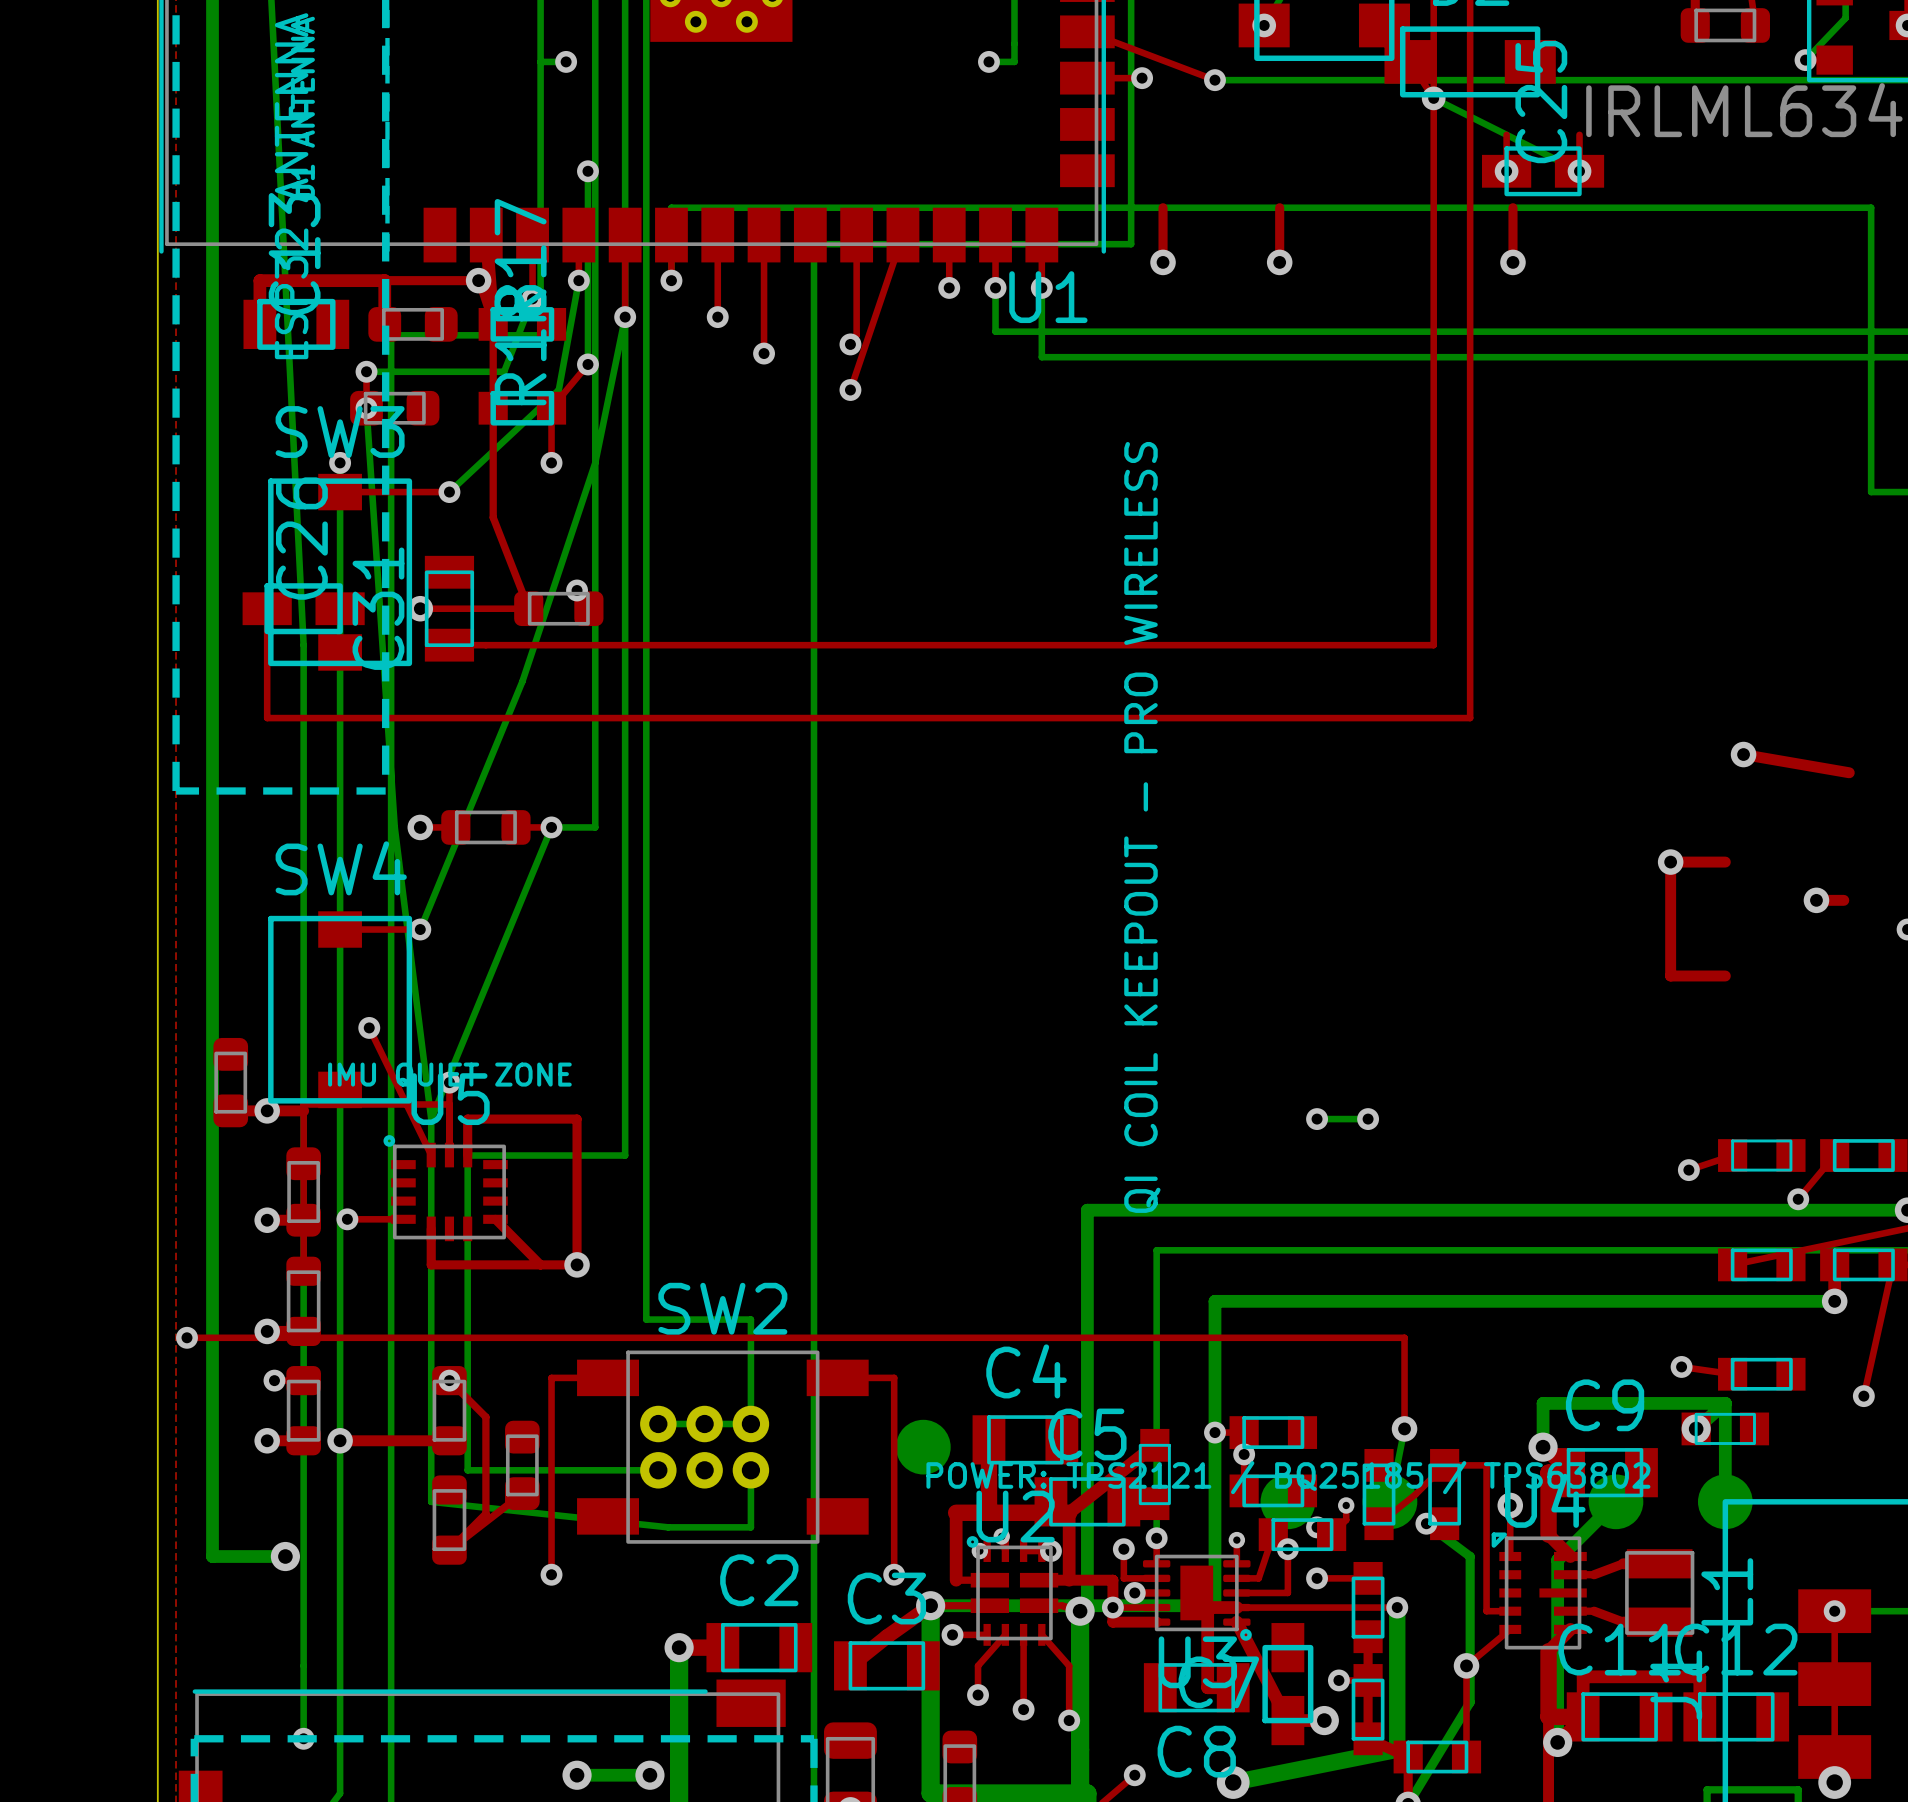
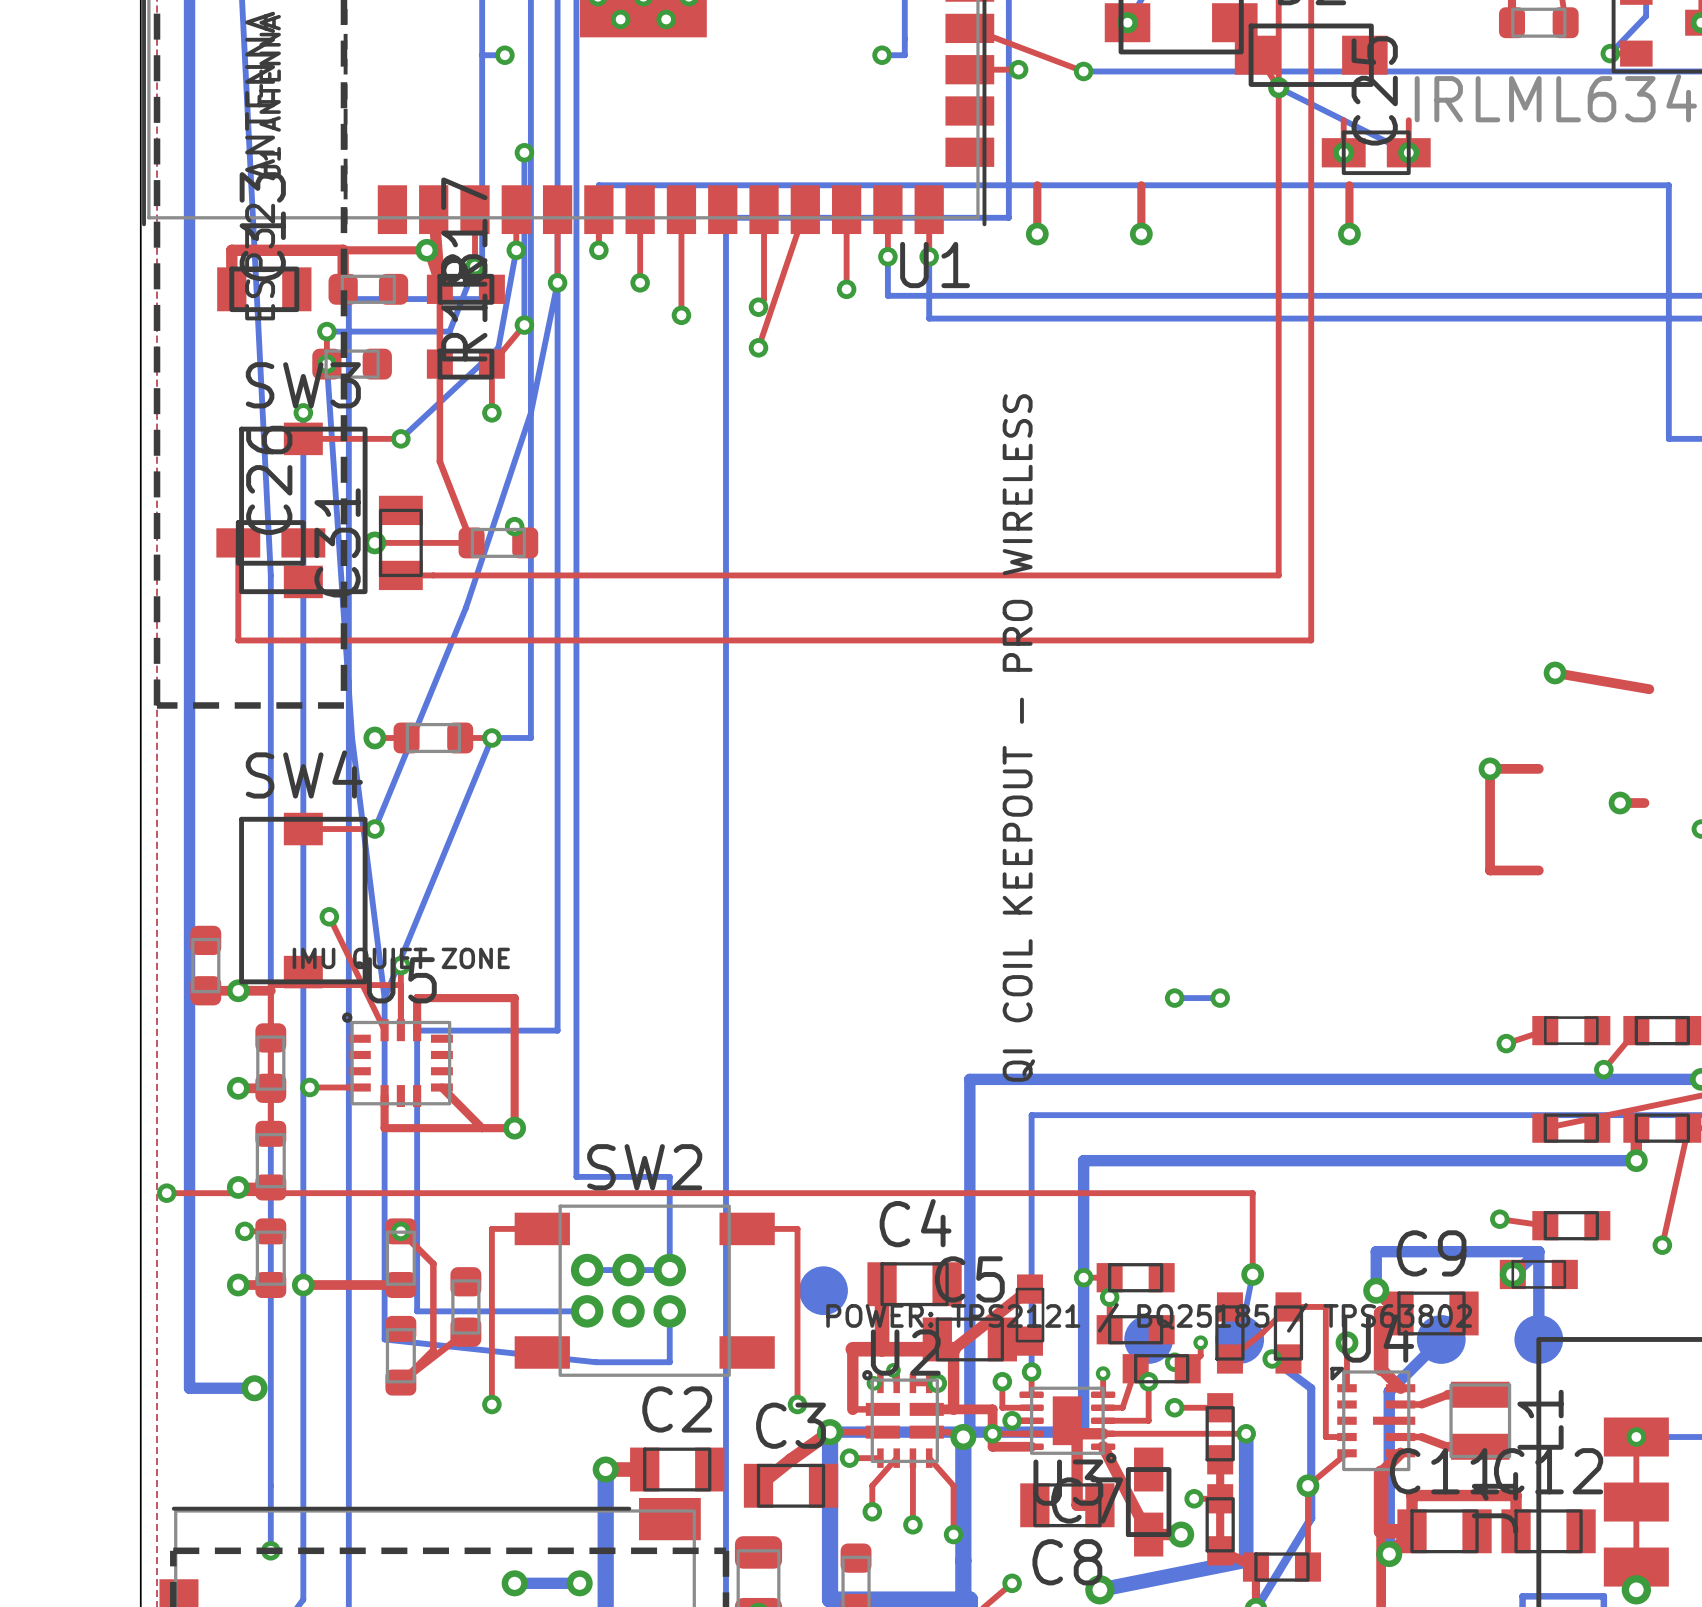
top track: none -> (846, 256) (846, 289)
via position: (949, 287) -> (846, 289)

